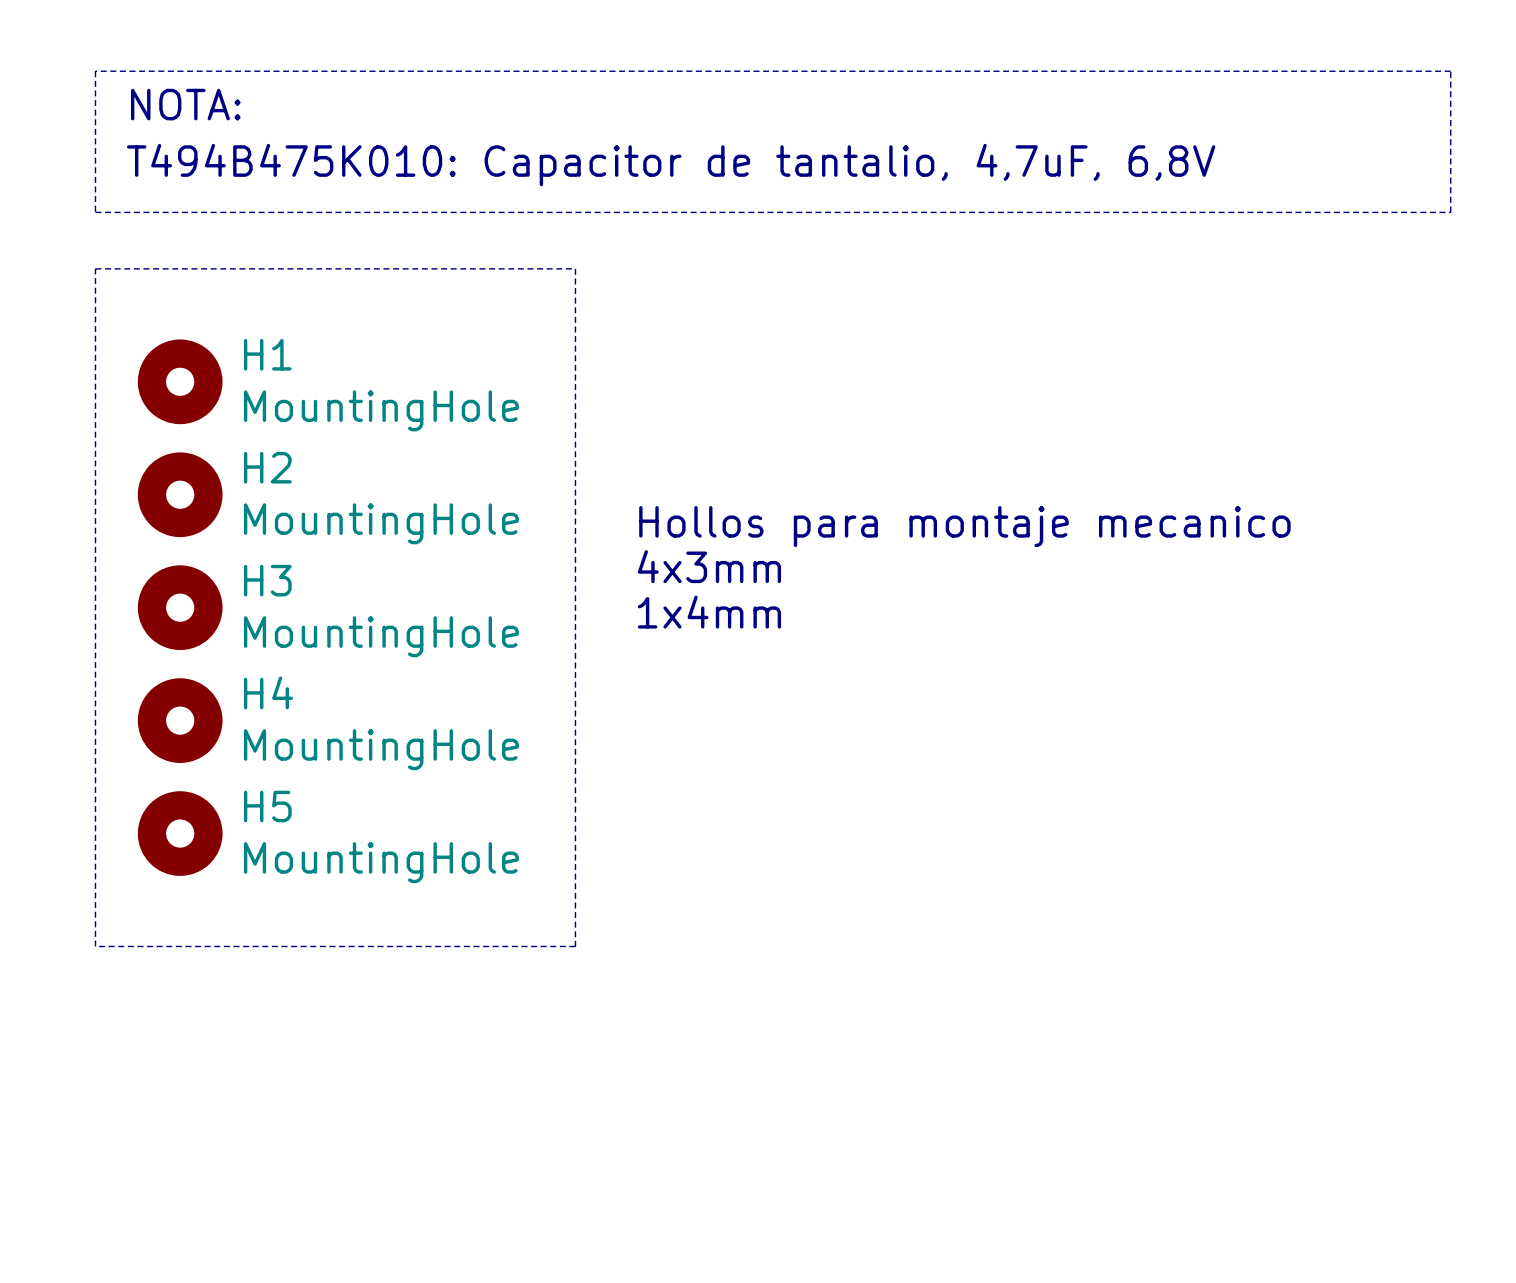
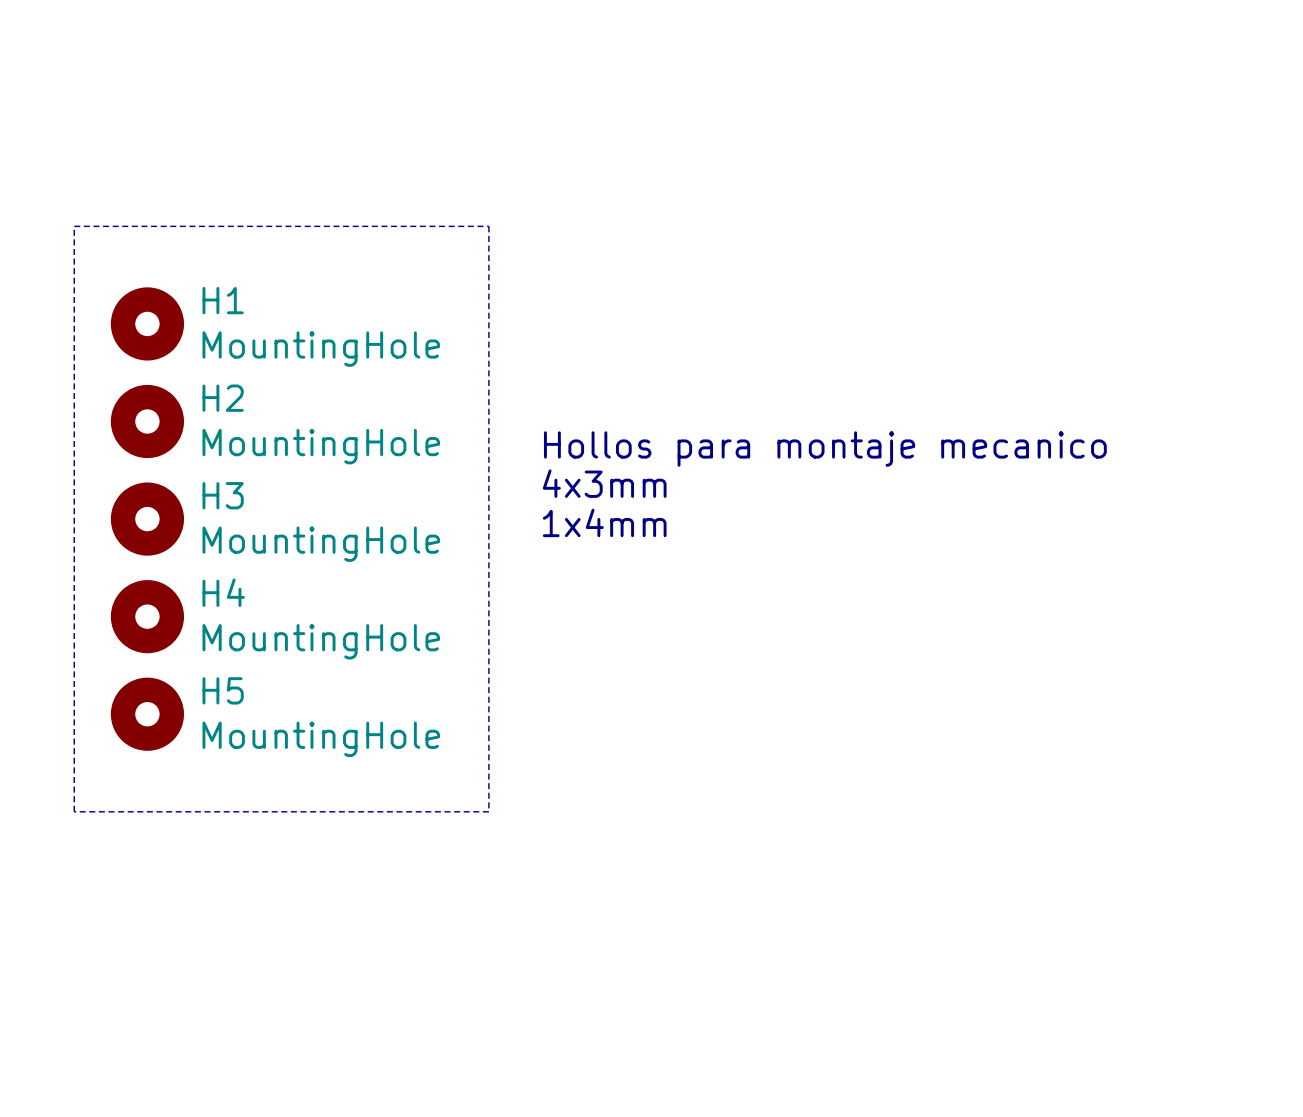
line: (95, 71) (95, 212) (1450, 212) (1450, 71) (95, 71) -> none
text: NOTA: (185, 104) -> none
text: T494B475K010: Capacitor de tantalio, 4,7uF, 6,8V (671, 165) -> none

